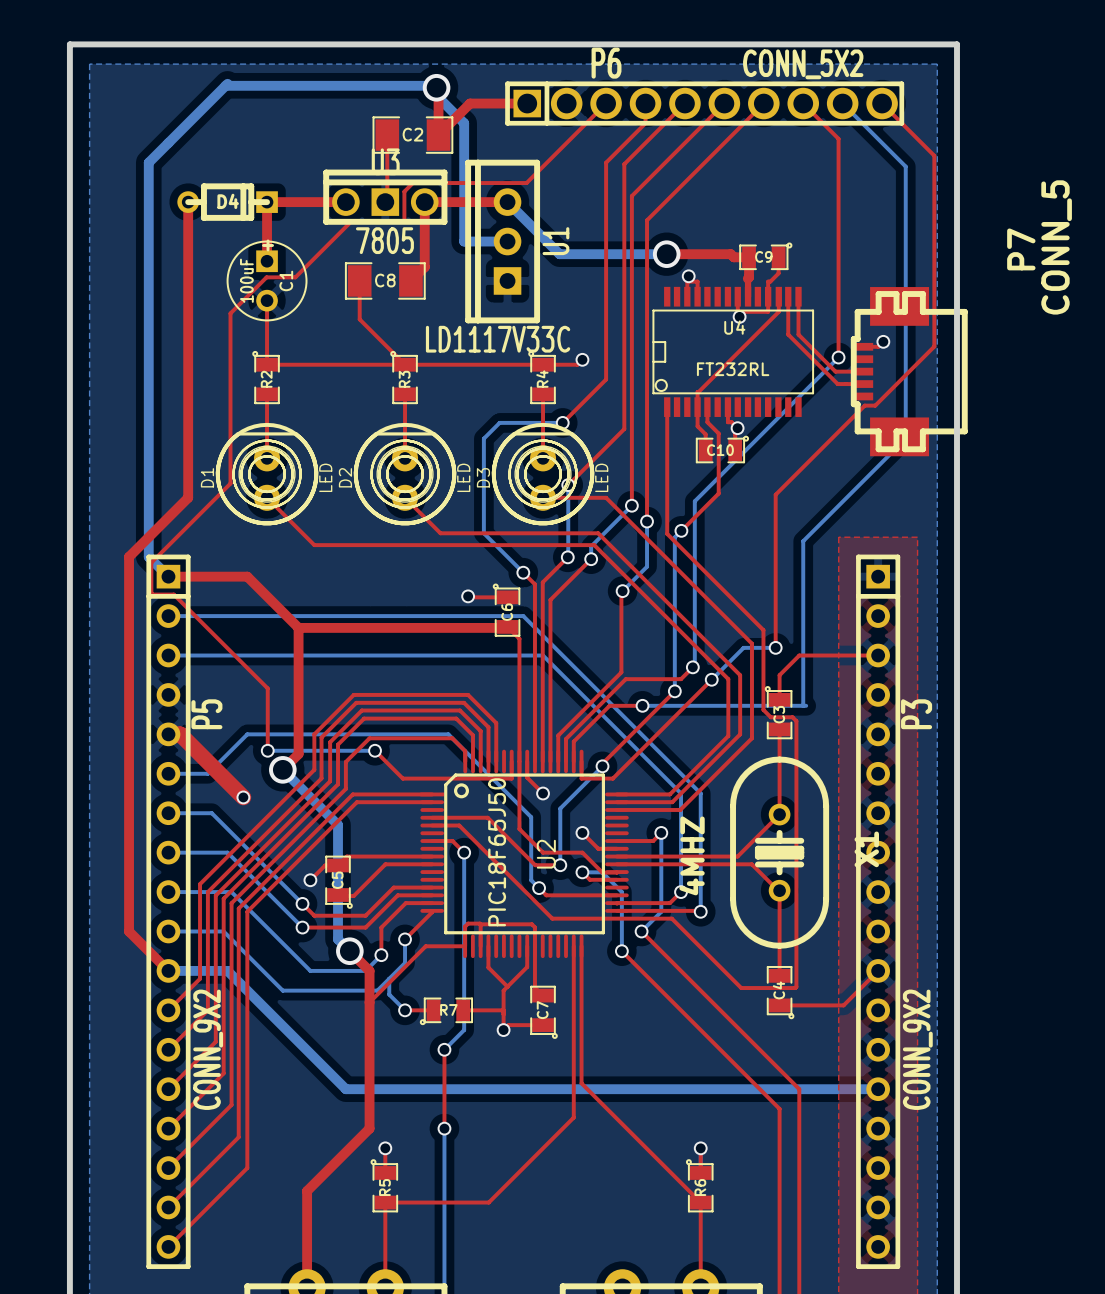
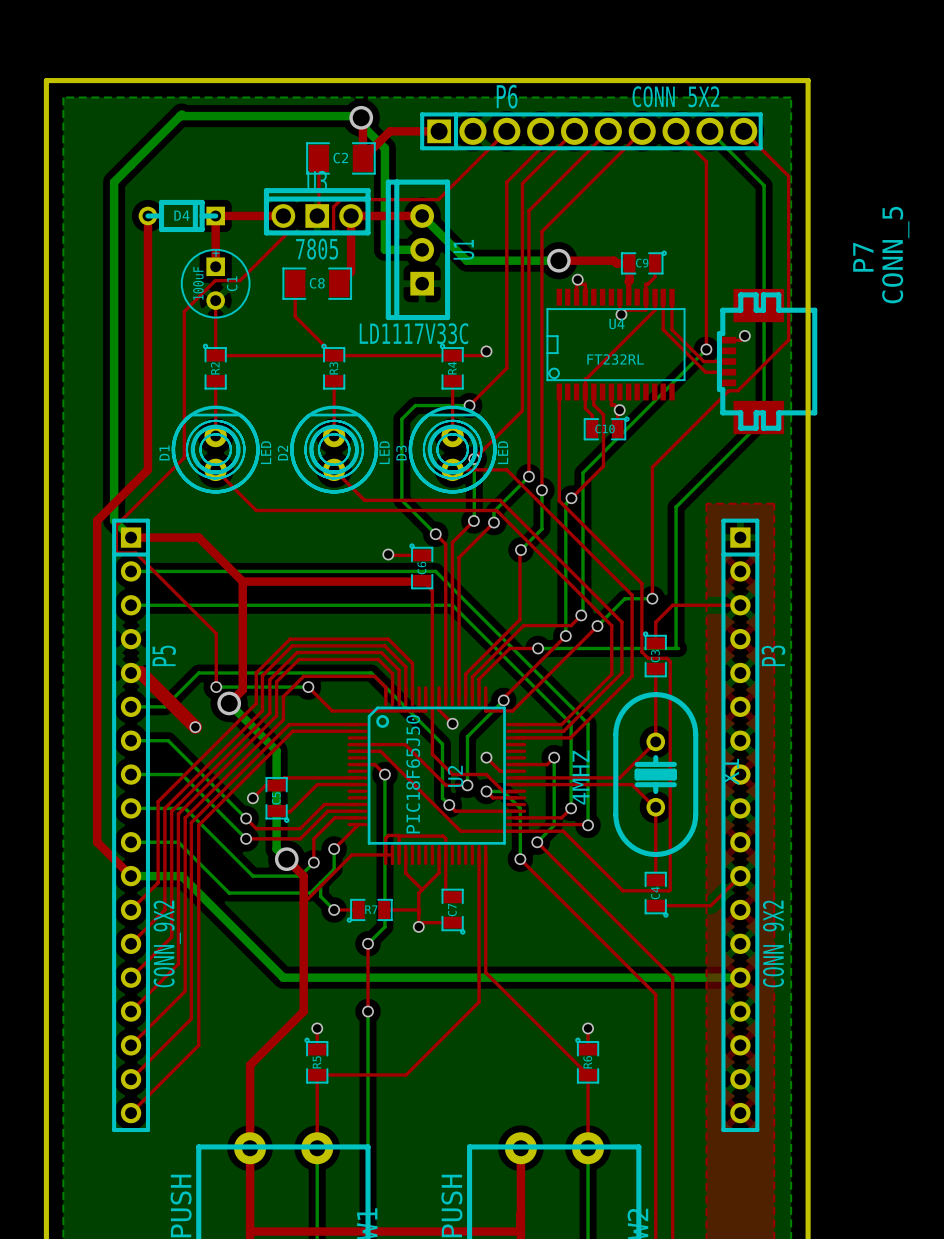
top track: none -> (385, 854) (392, 854)

